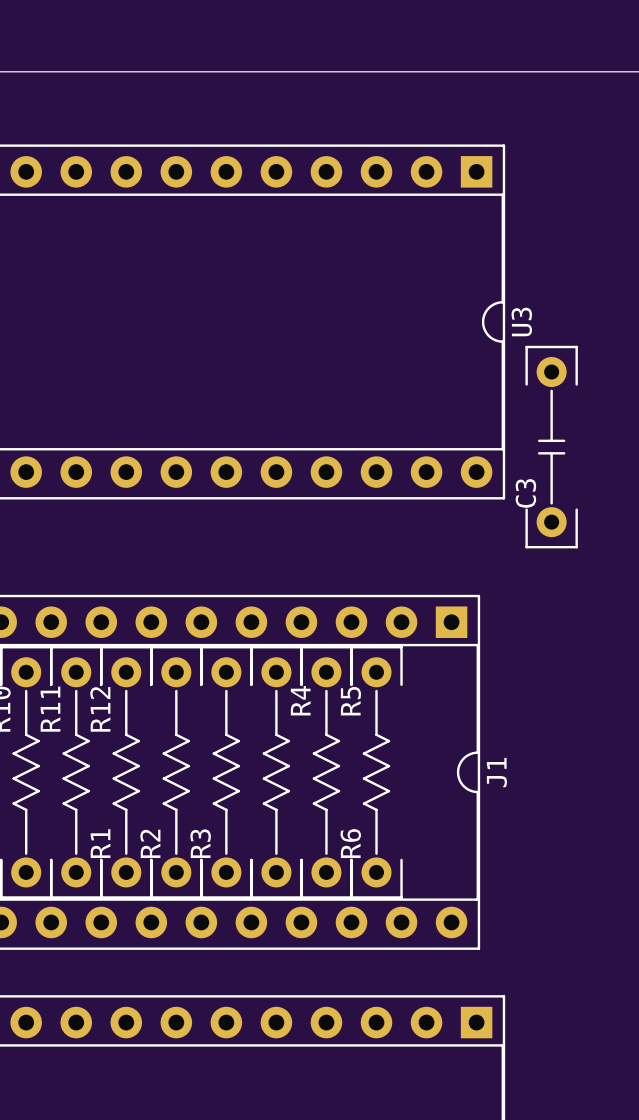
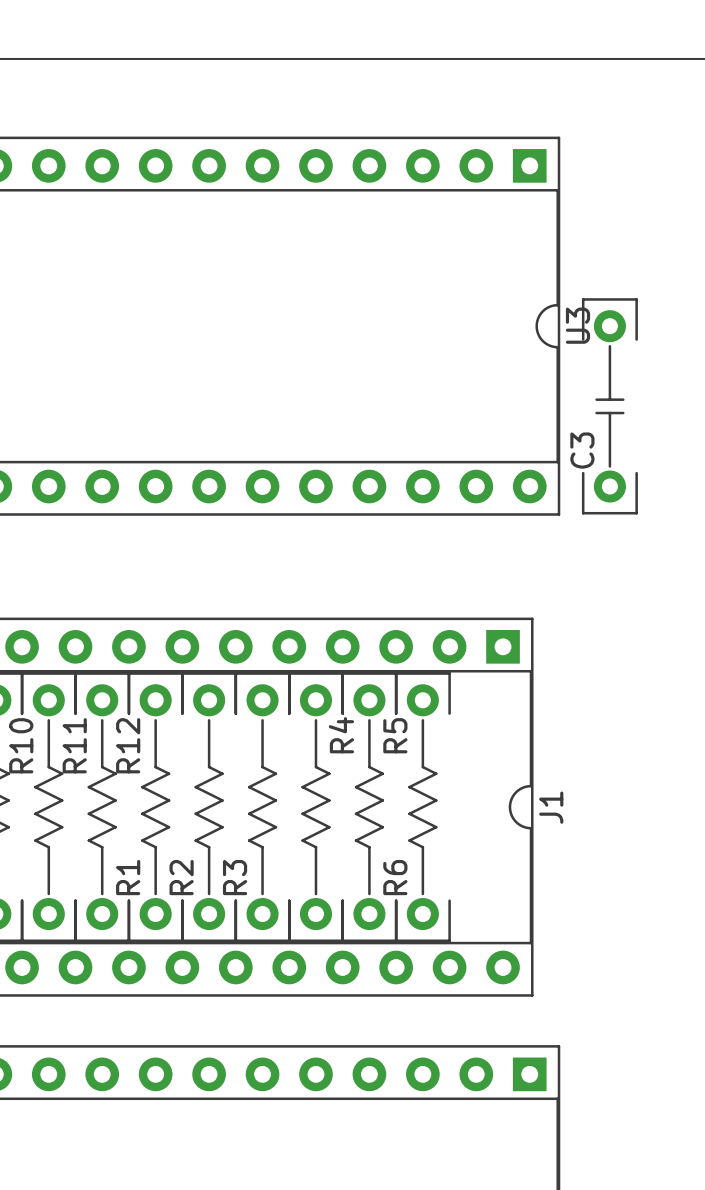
C3 position: (551, 447) -> (609, 406)

